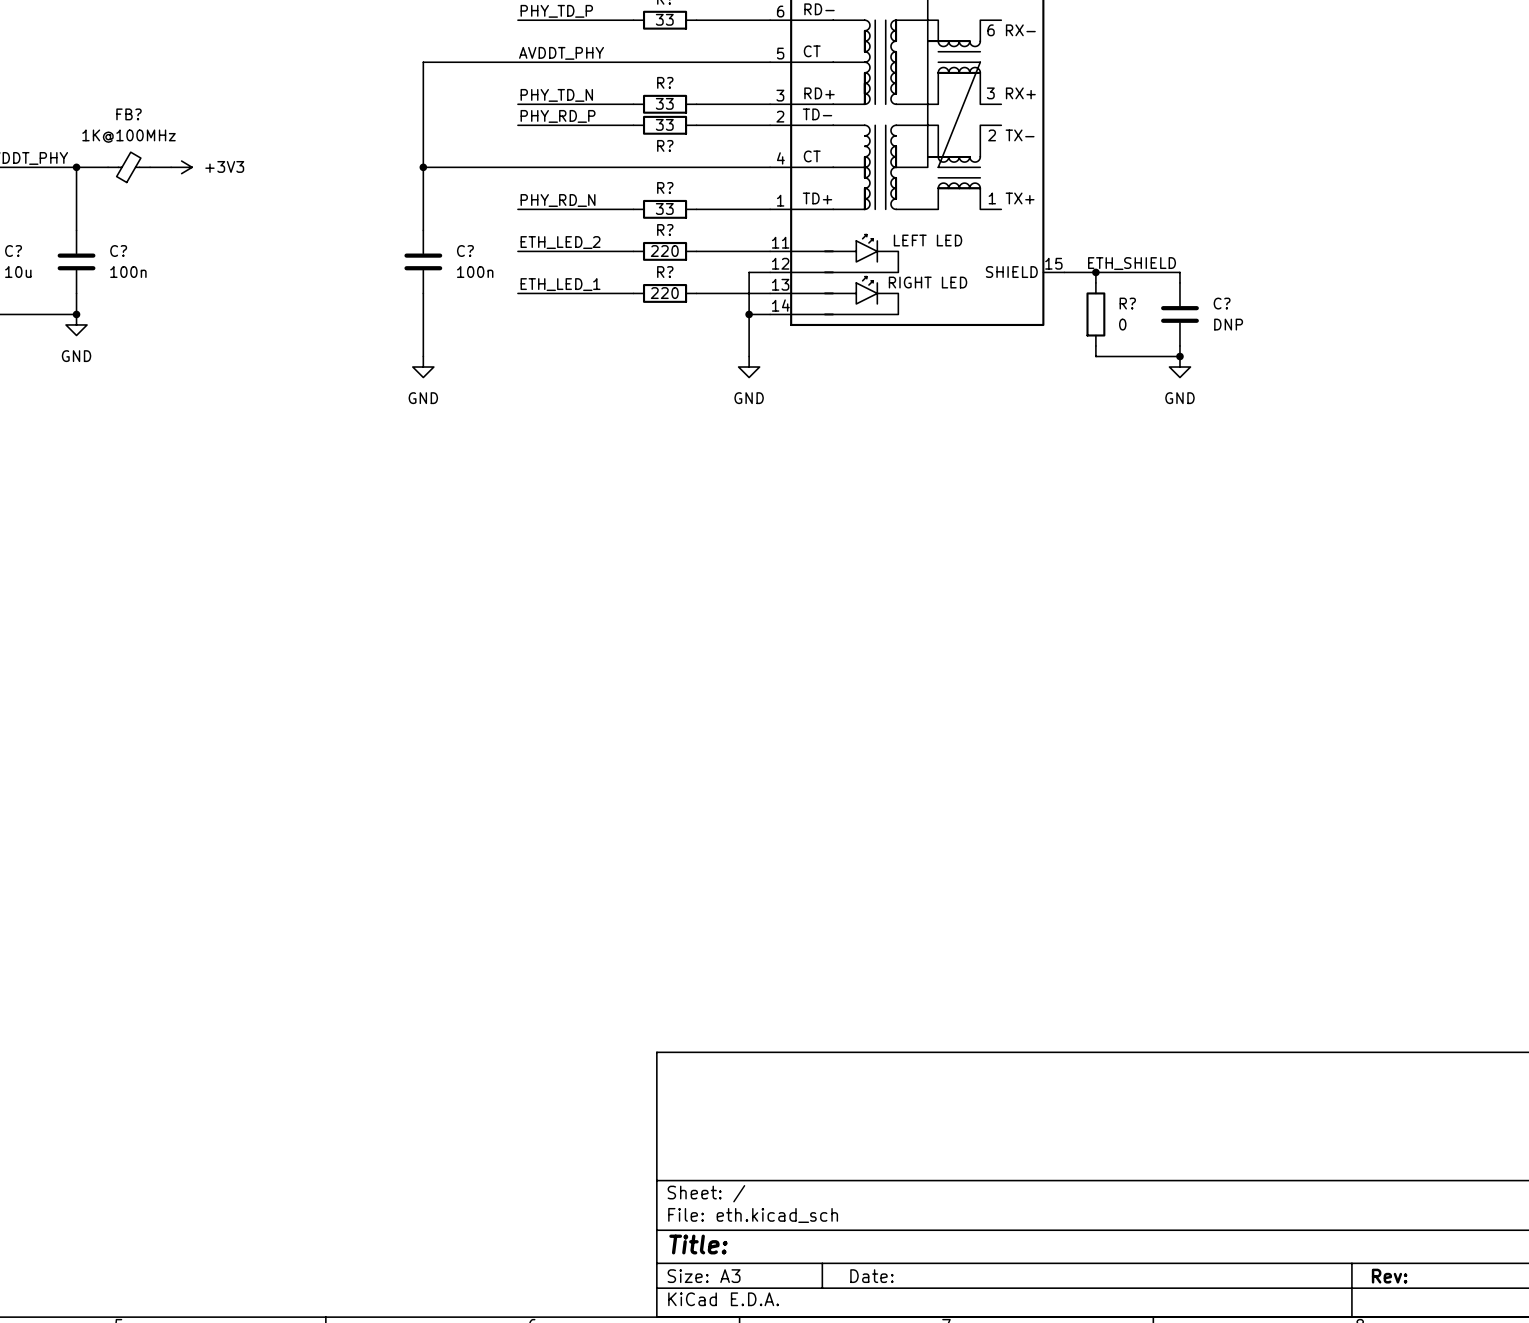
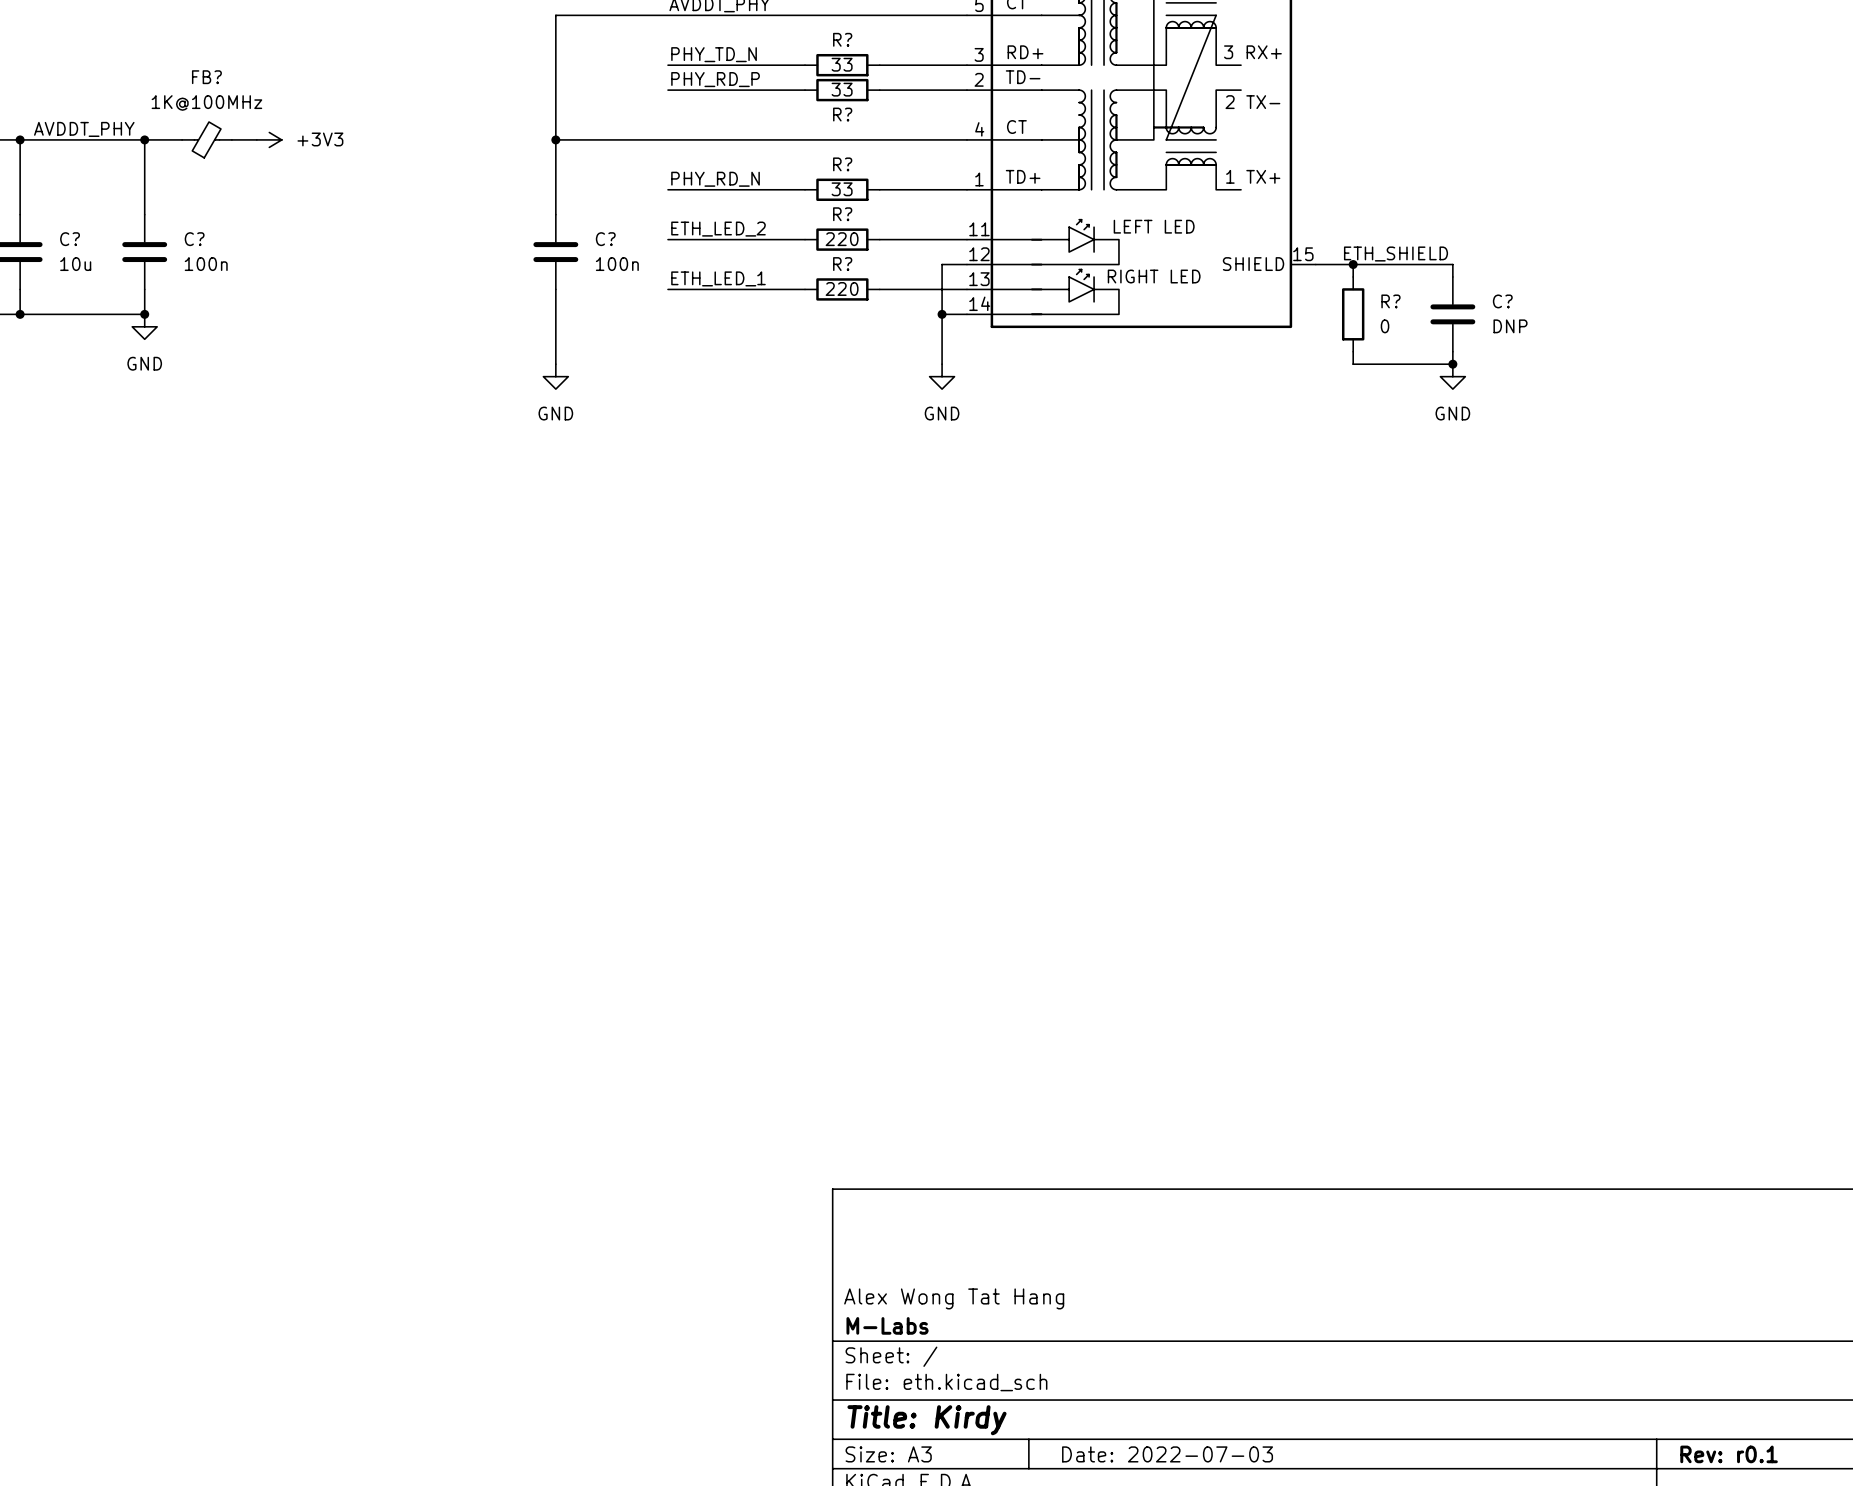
title block: none -> Alex Wong Tat Hang (954, 1298)
title block: none -> M-Labs (887, 1325)
title block: Title: (698, 1244) -> Title: Kirdy (926, 1420)
title block: Date: (871, 1276) -> Date: 2022-07-03 (1167, 1454)
title block: Rev: (1389, 1276) -> Rev: r0.1 (1729, 1454)

